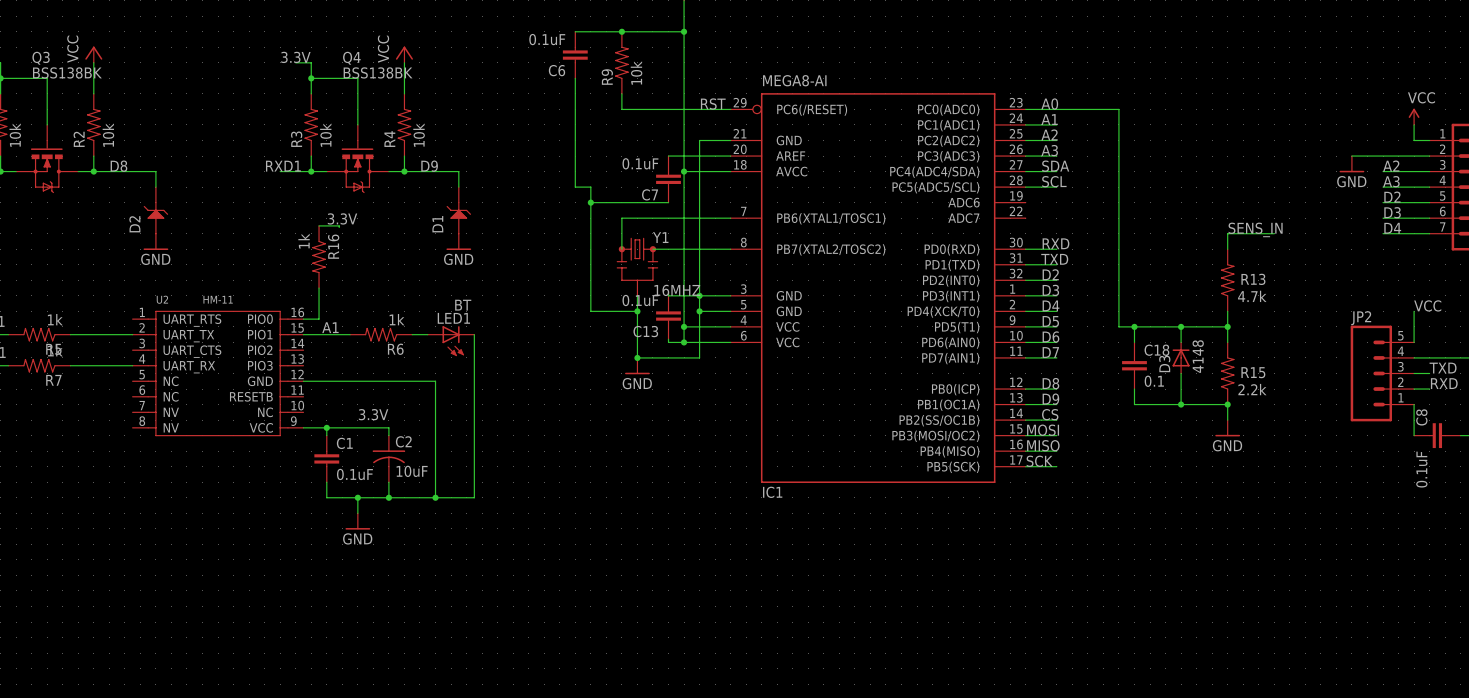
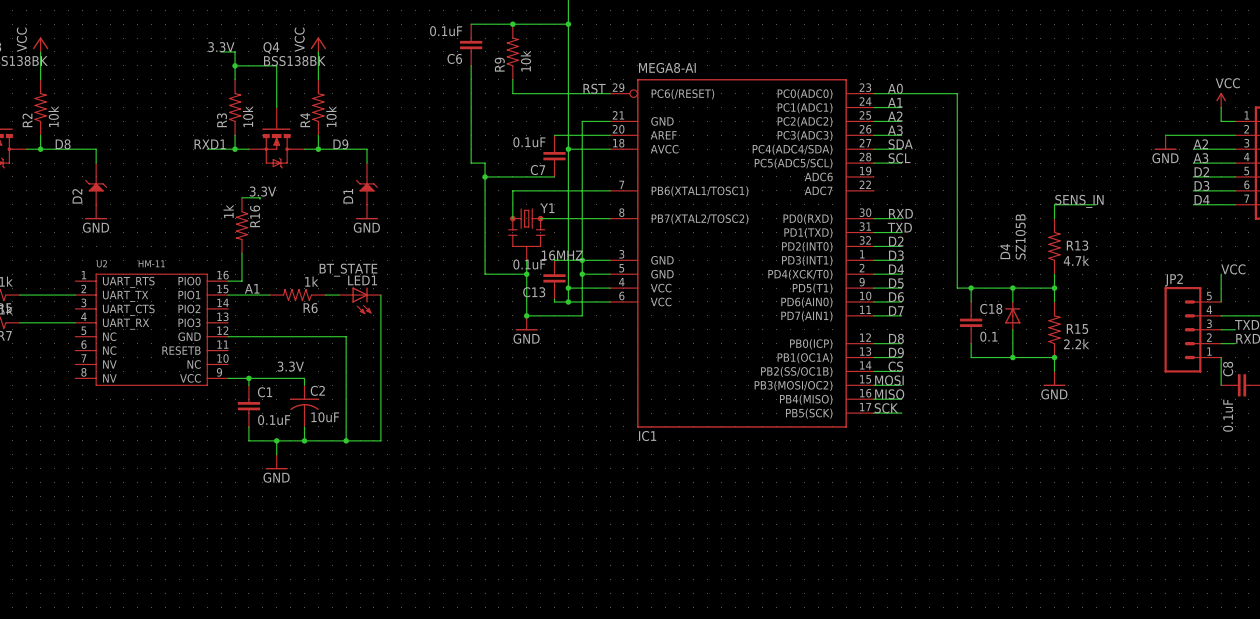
LED1 value: BT (463, 305) -> BT_STATE (348, 270)
D3 value: 4148 (1198, 356) -> SZ105B (1020, 236)
D3 name: D3 (1164, 363) -> D4 (1005, 251)

